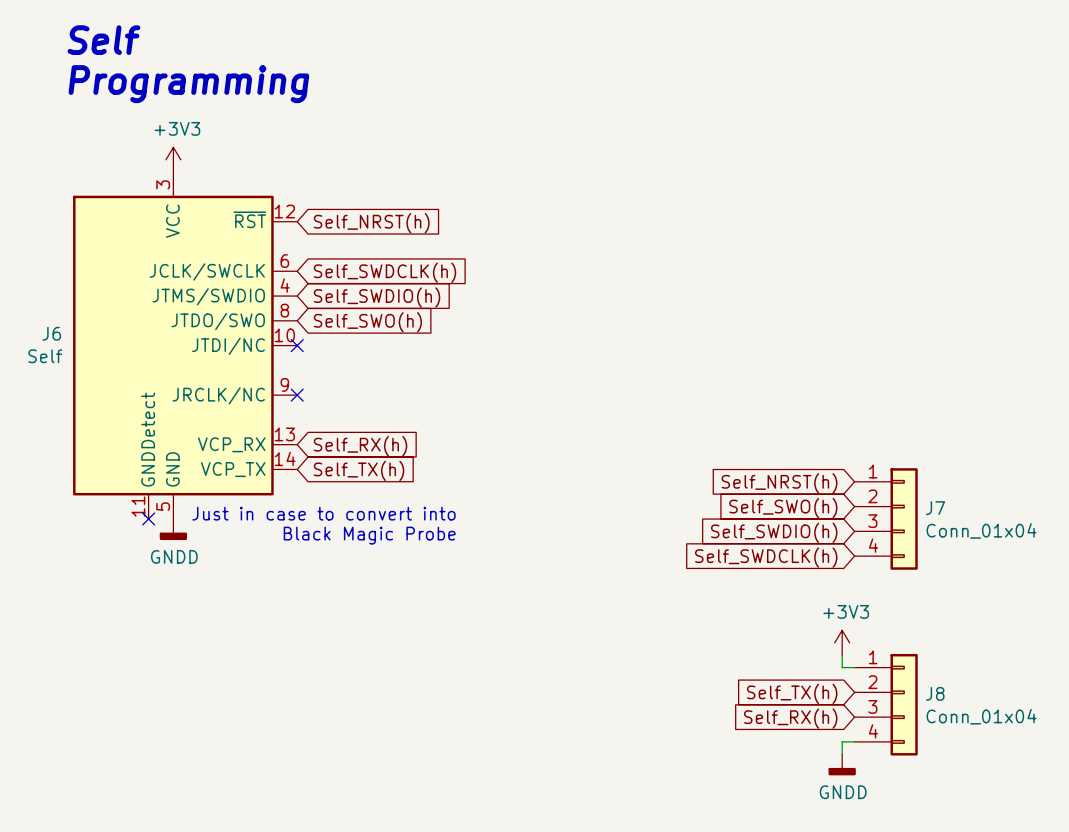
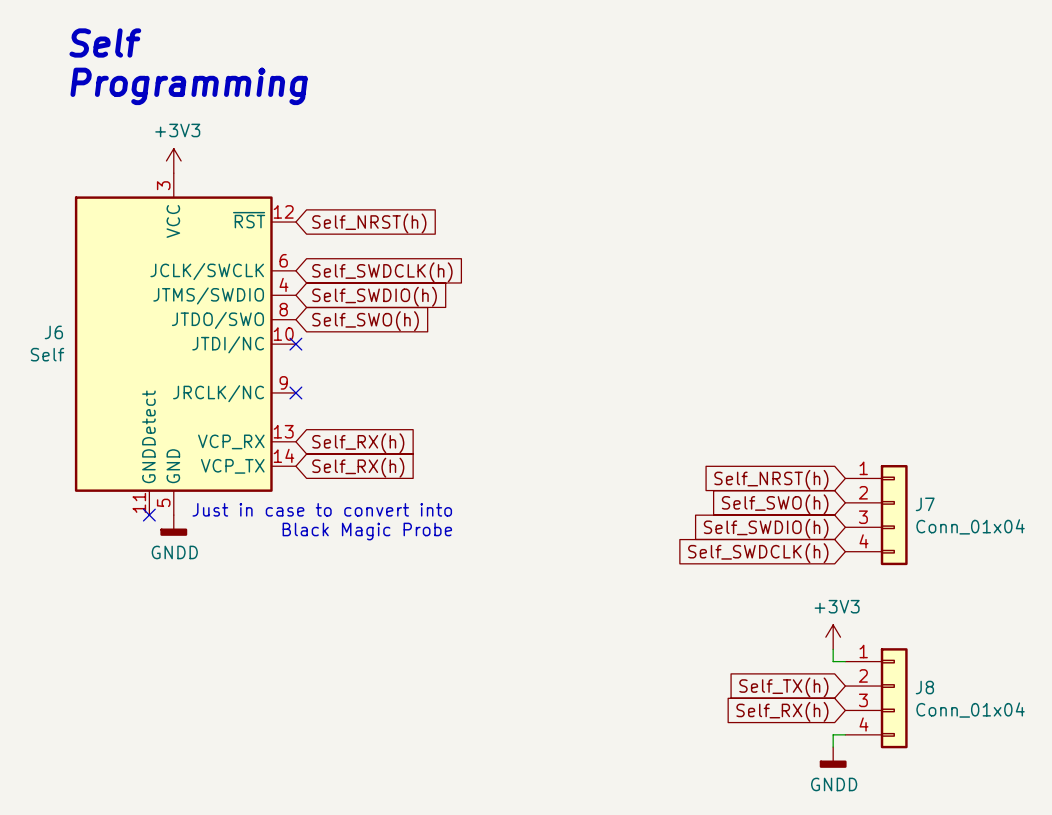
global label: Self_TX(h) (359, 470) -> Self_RX(h) (358, 467)

